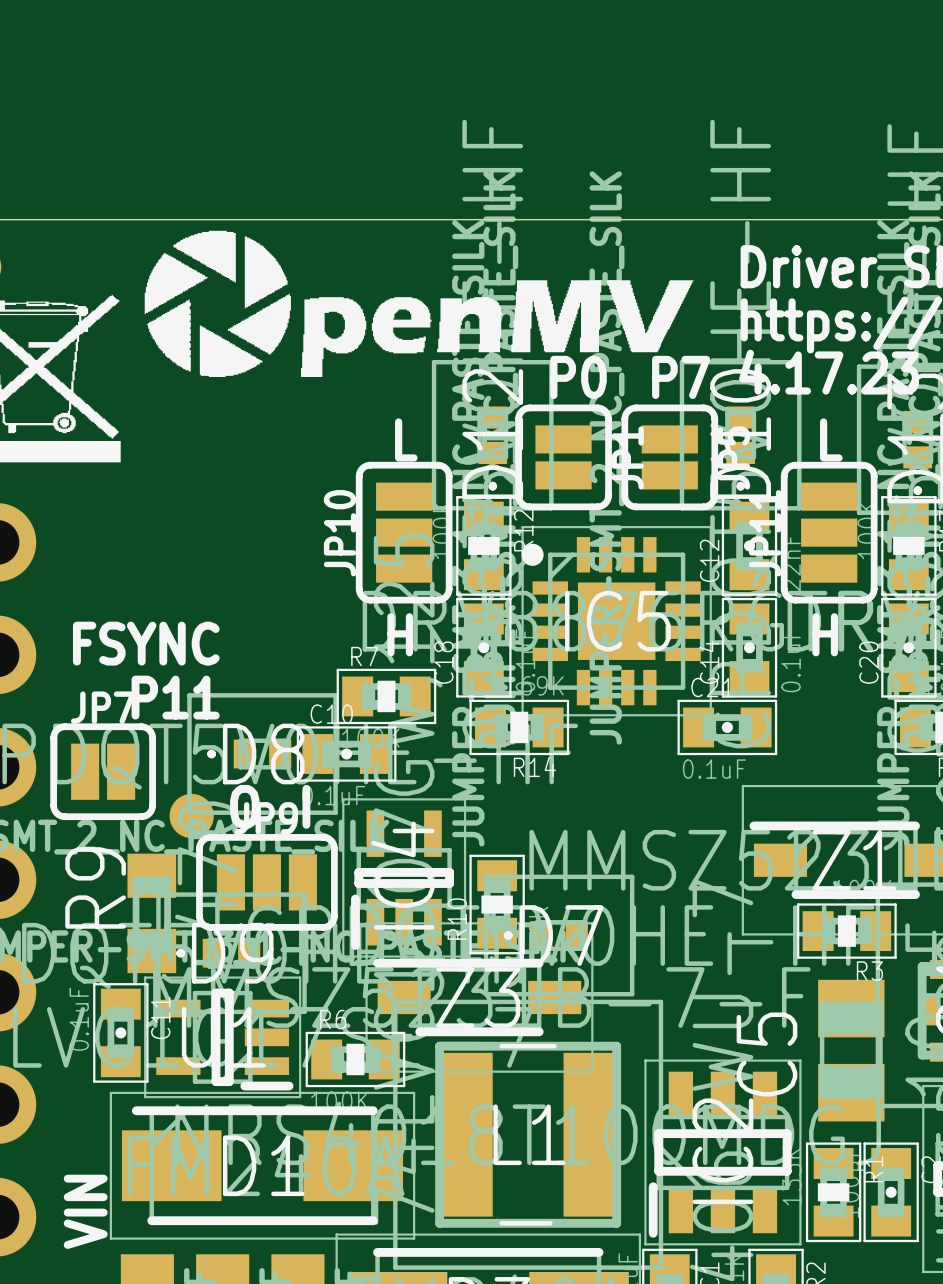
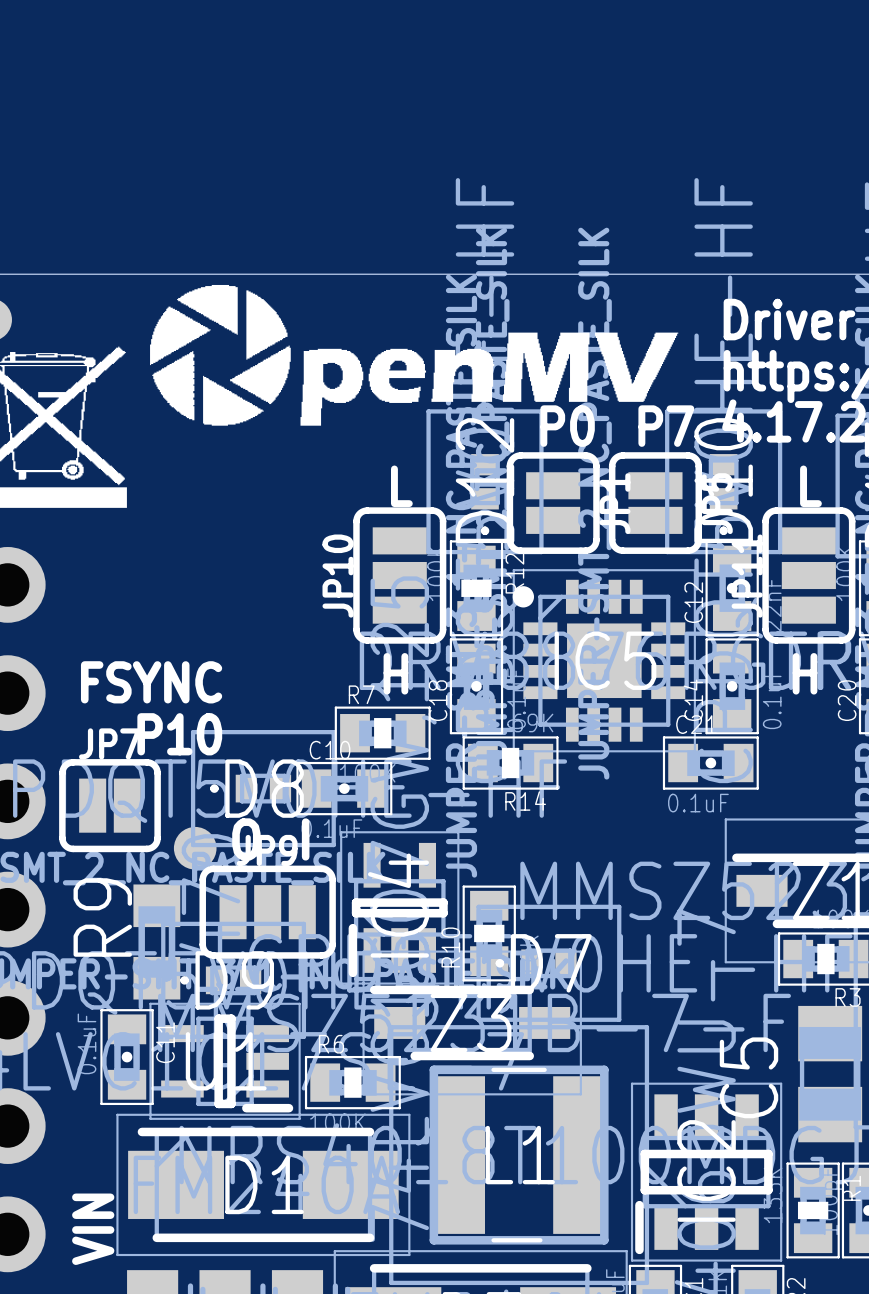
text: P11 (175, 697) -> P10 (179, 734)

